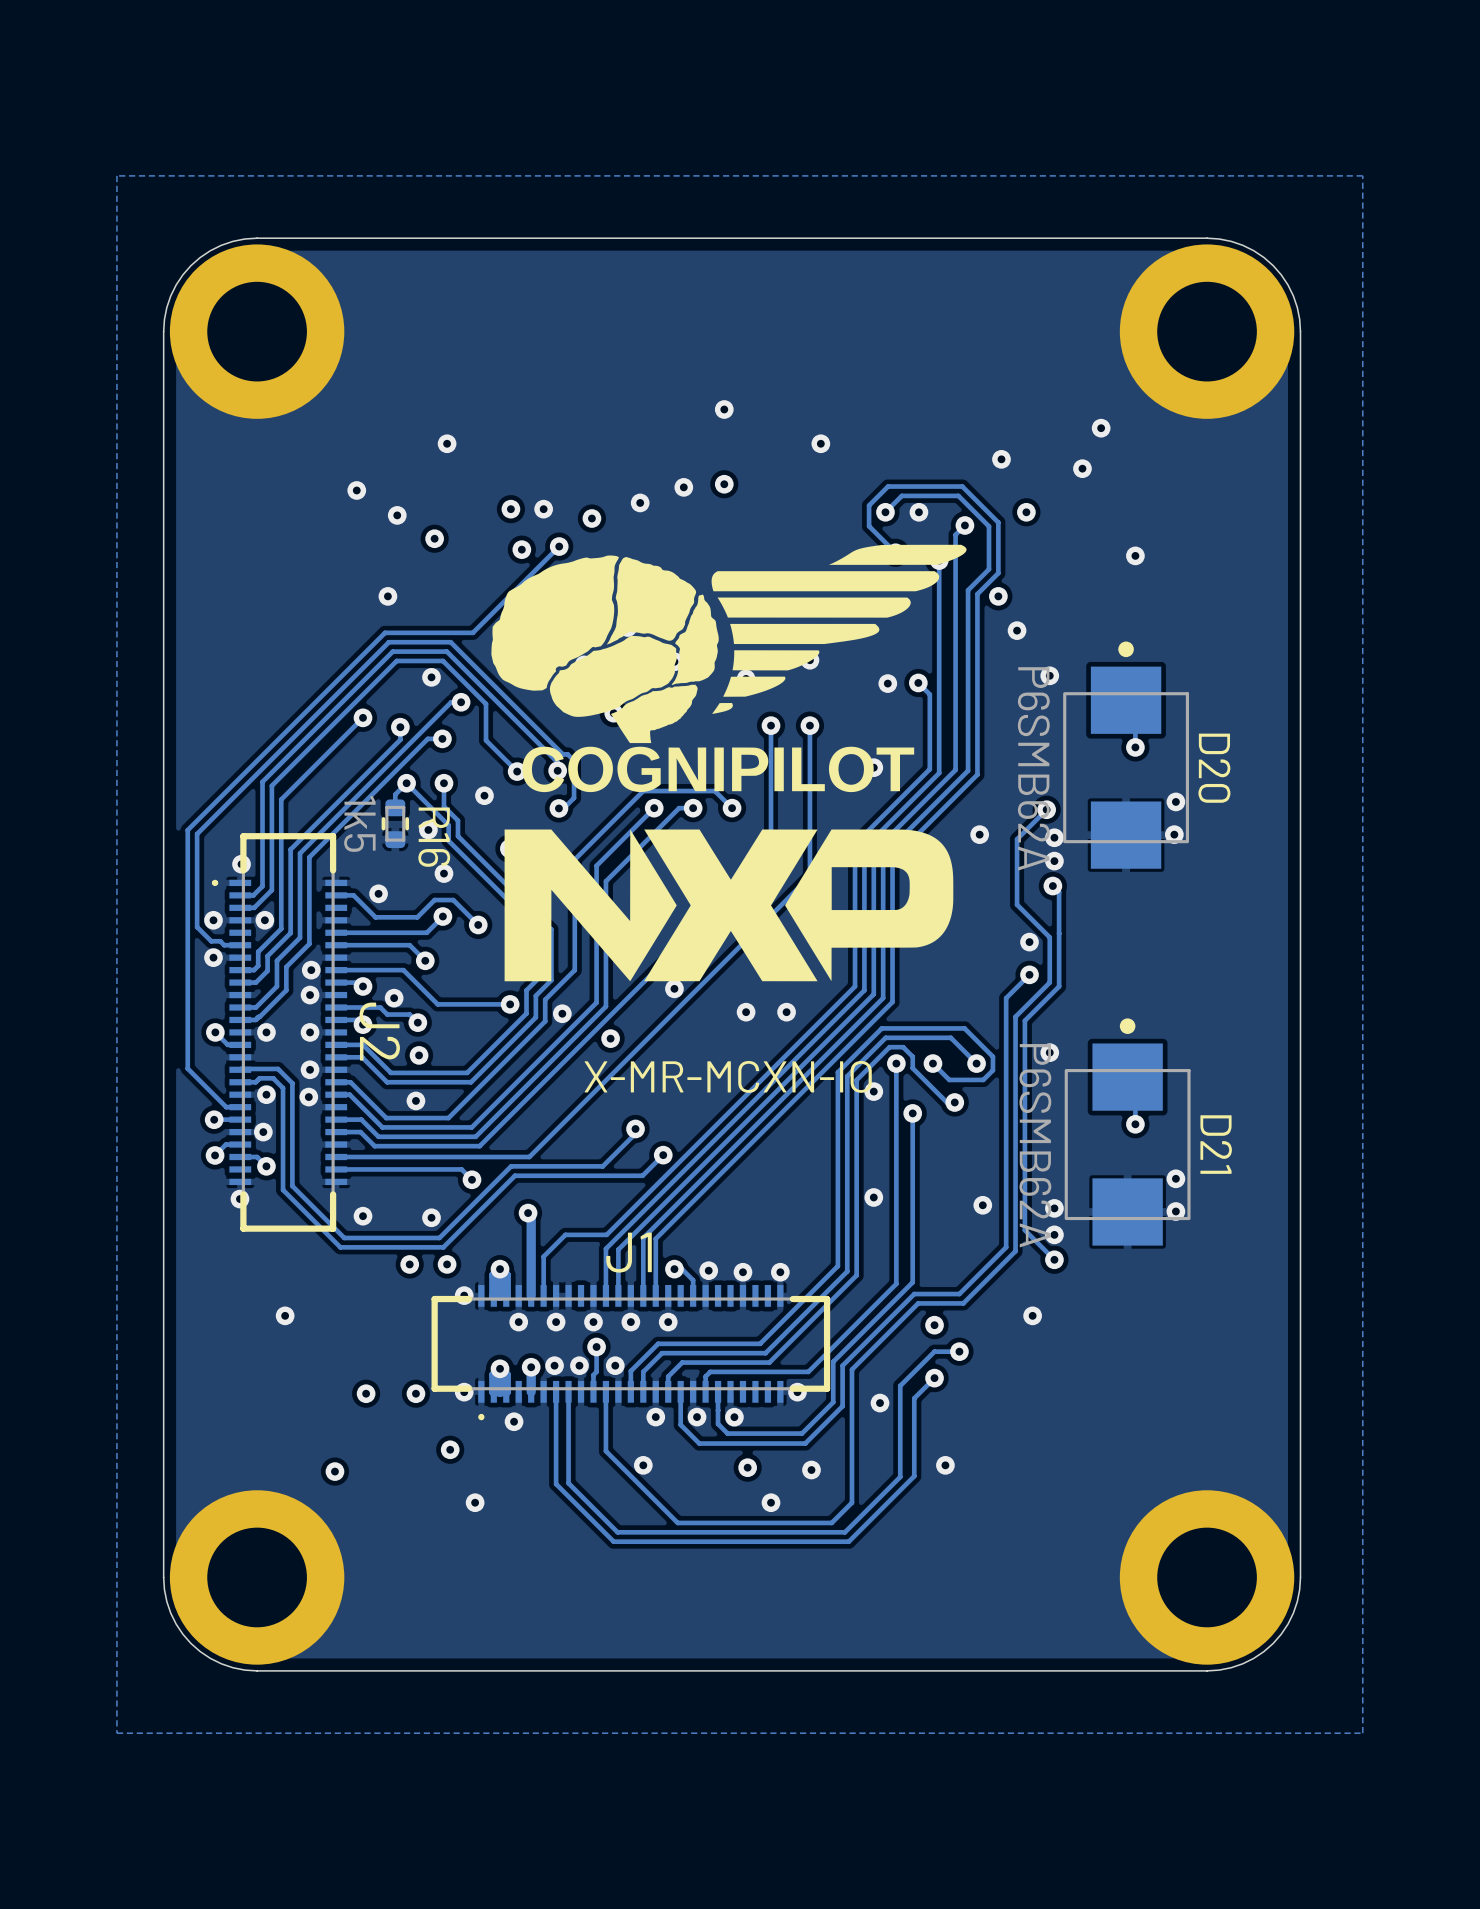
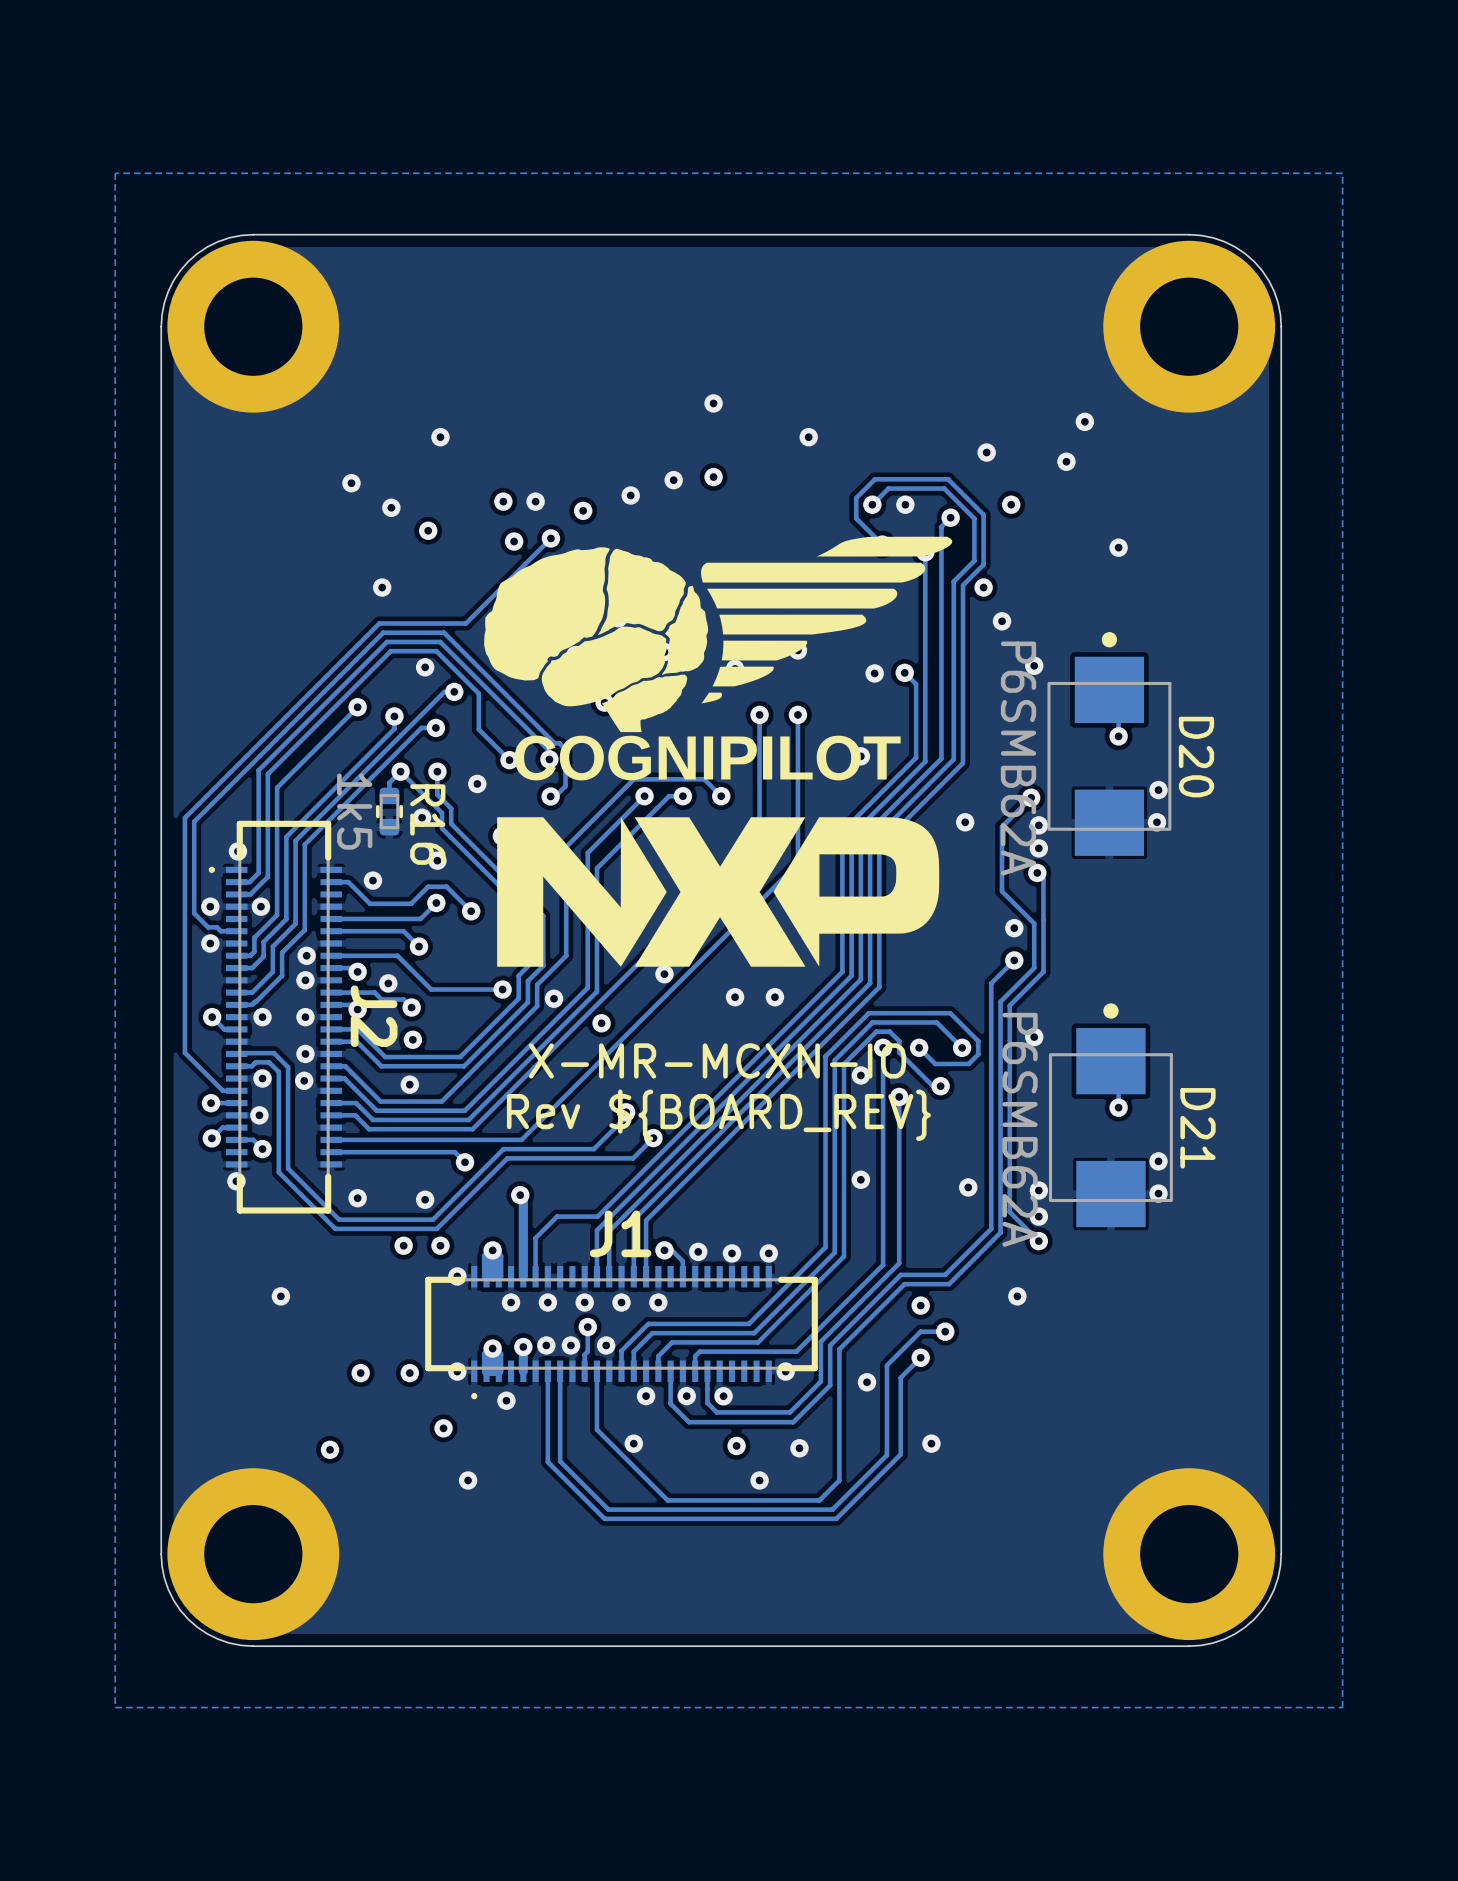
text: none -> Rev ${BOARD_REV} (718, 1115)

